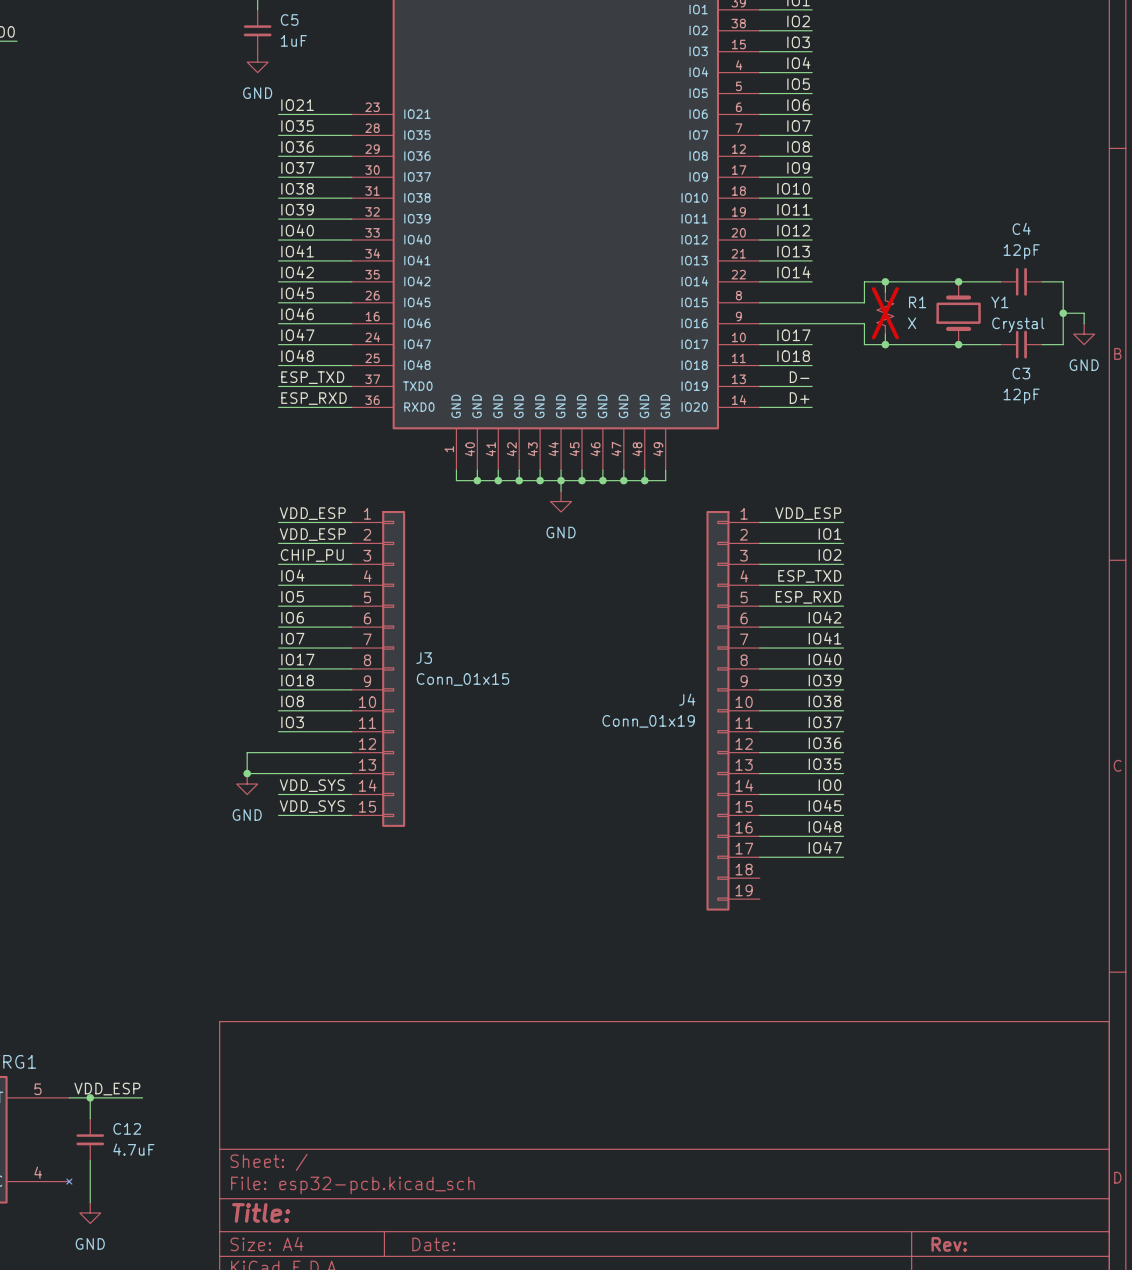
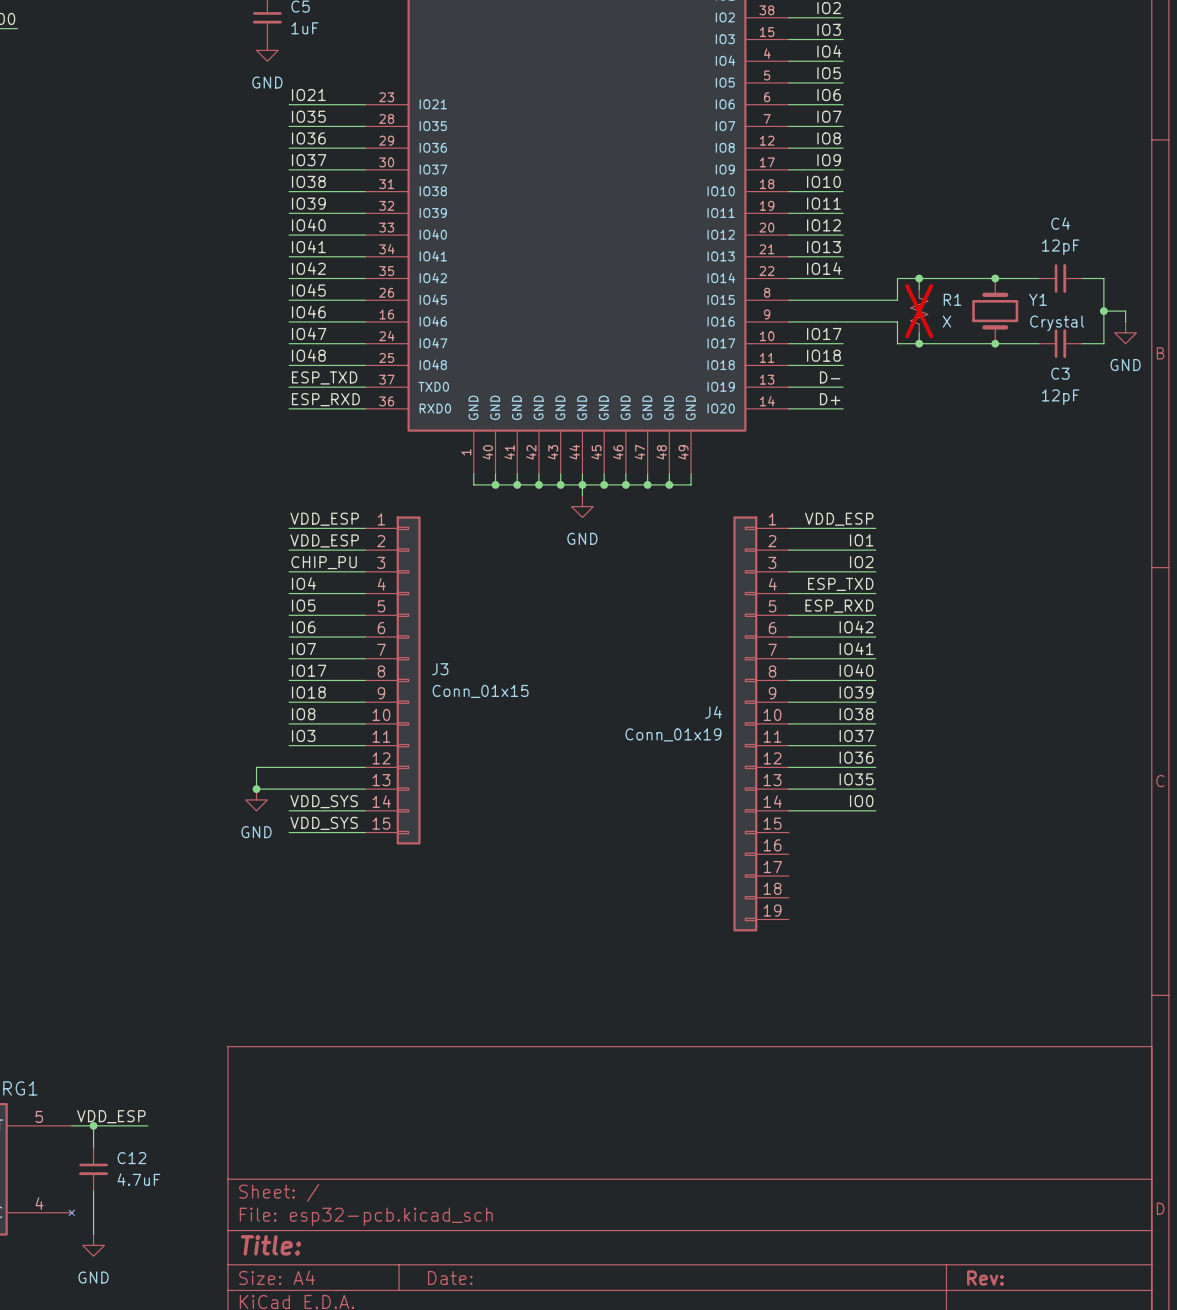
label: IO45 (825, 805) -> none
wire: (759, 815) (843, 815) -> none
label: IO48 (825, 826) -> none
wire: (759, 836) (843, 836) -> none
label: IO47 (825, 847) -> none
wire: (759, 857) (843, 857) -> none

